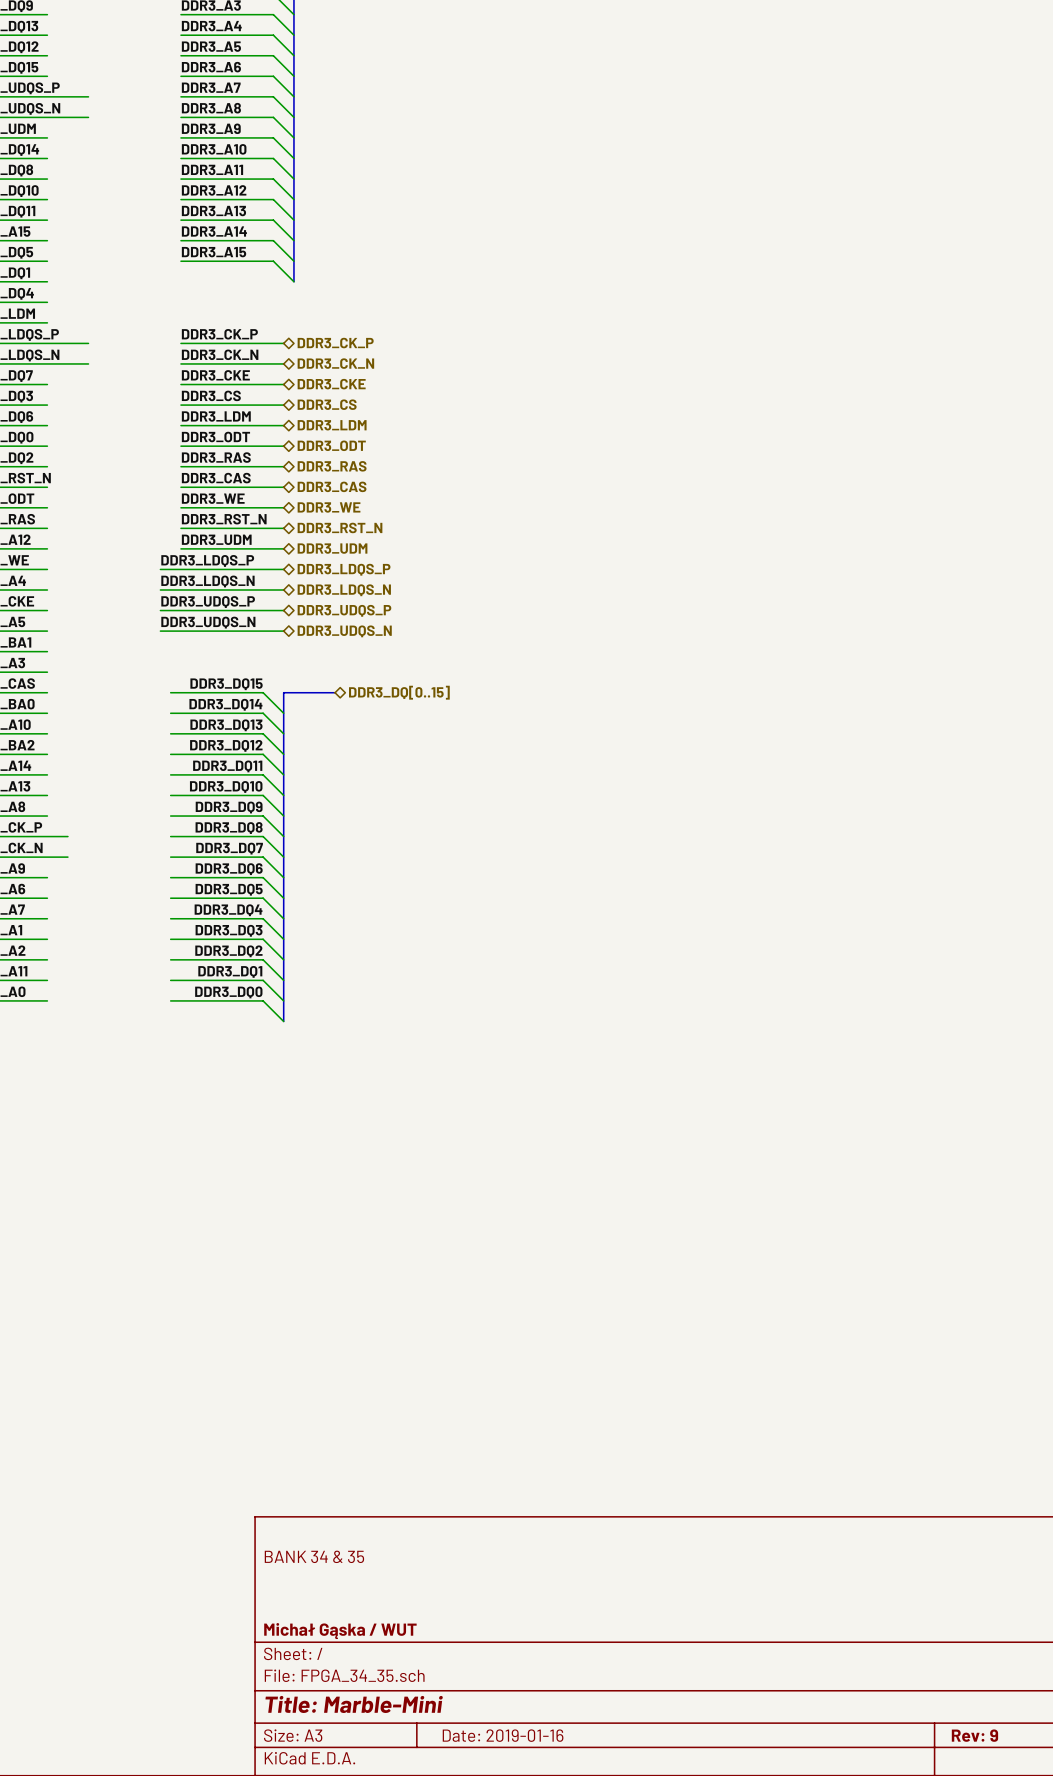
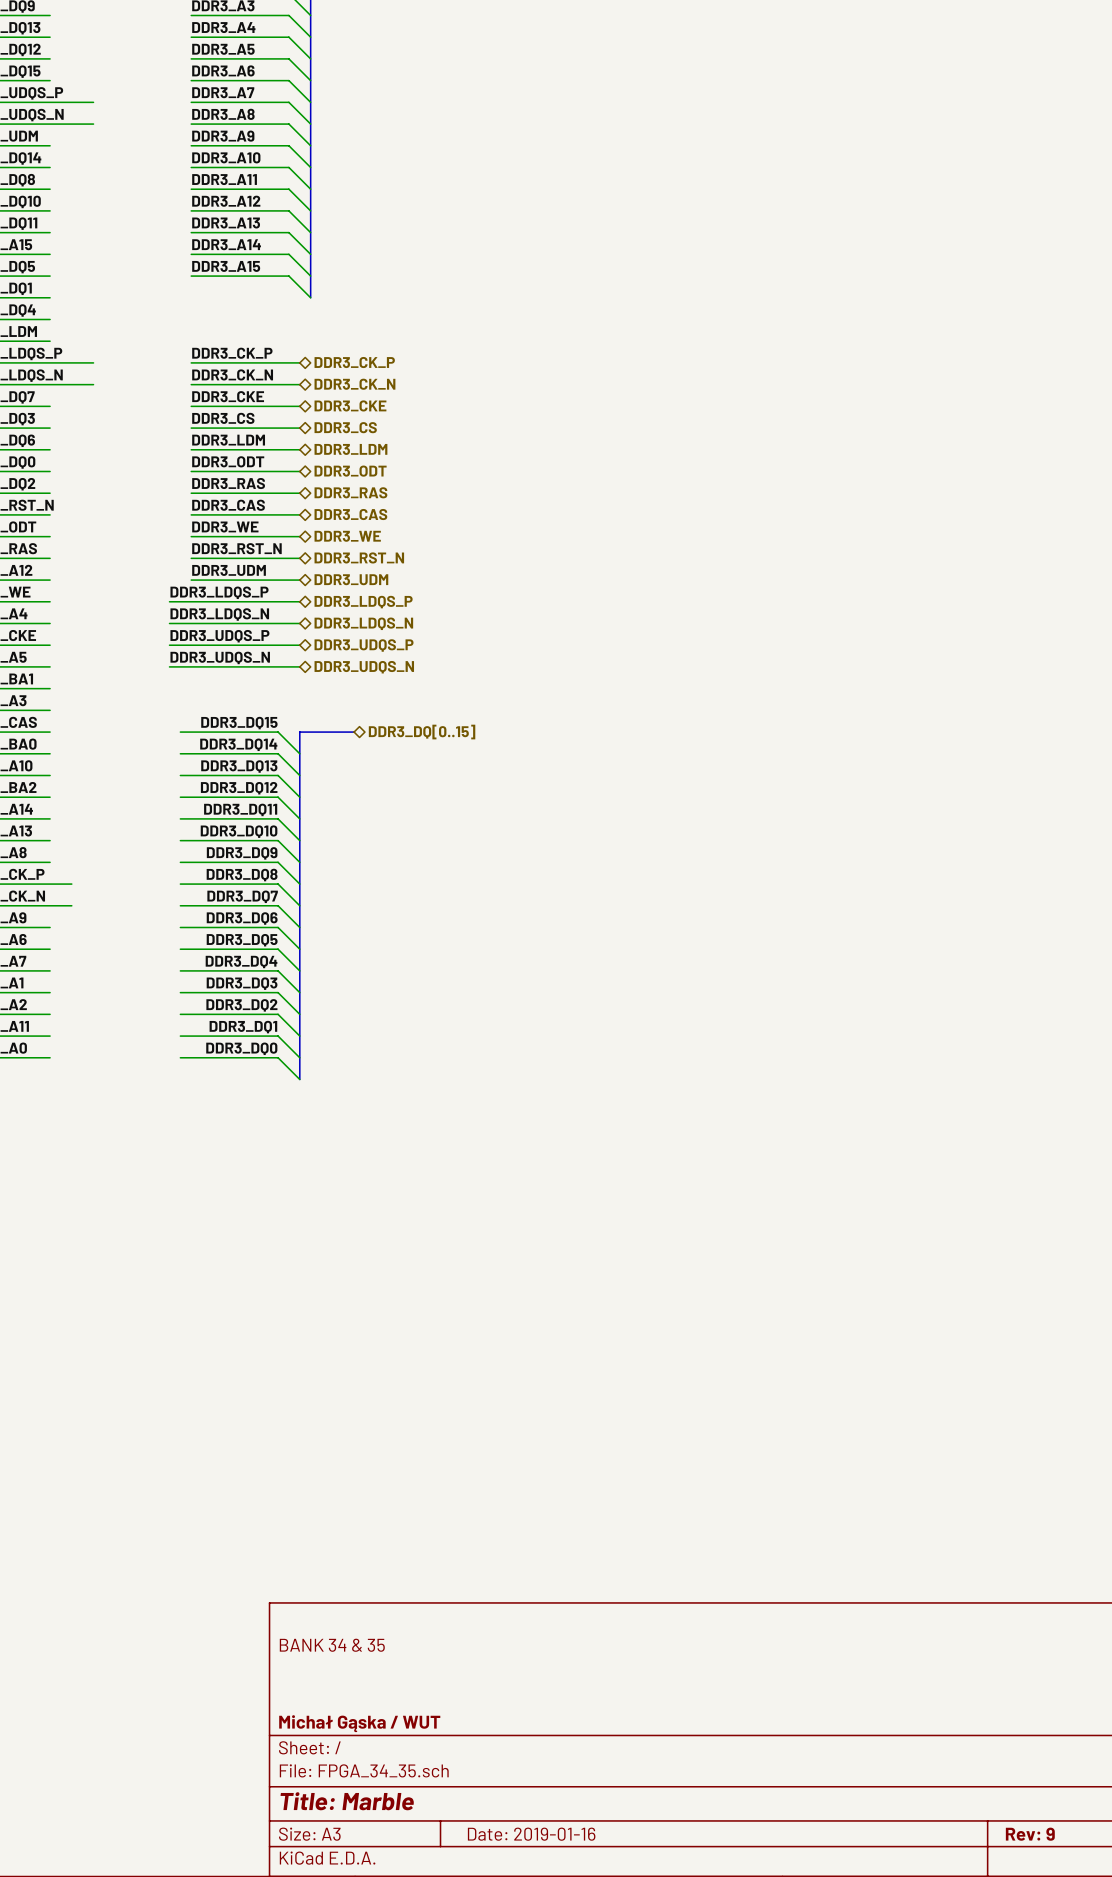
title block: Title: Marble-Mini (354, 1704) -> Title: Marble (347, 1801)

